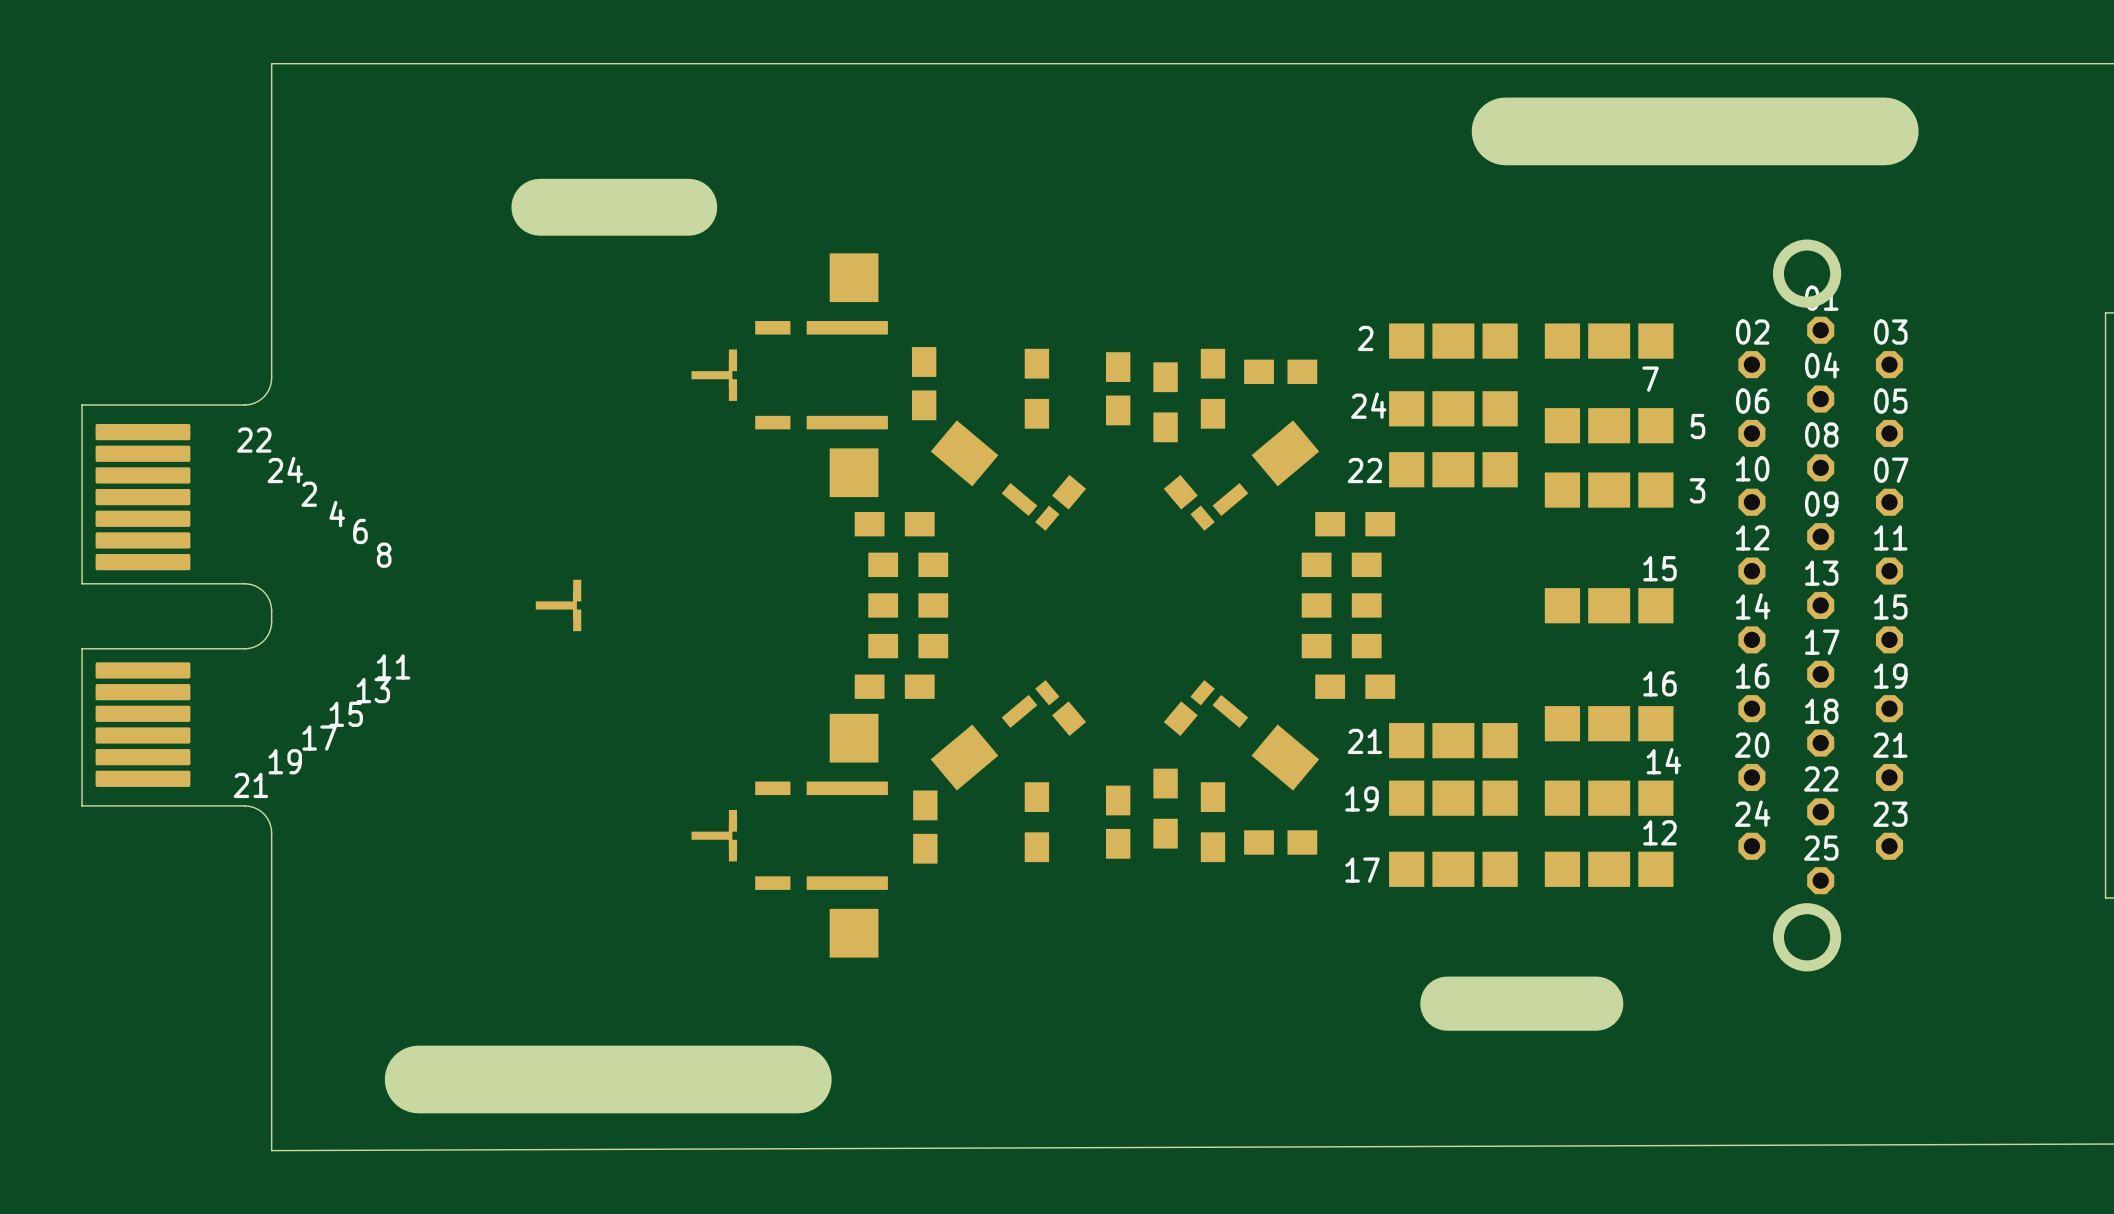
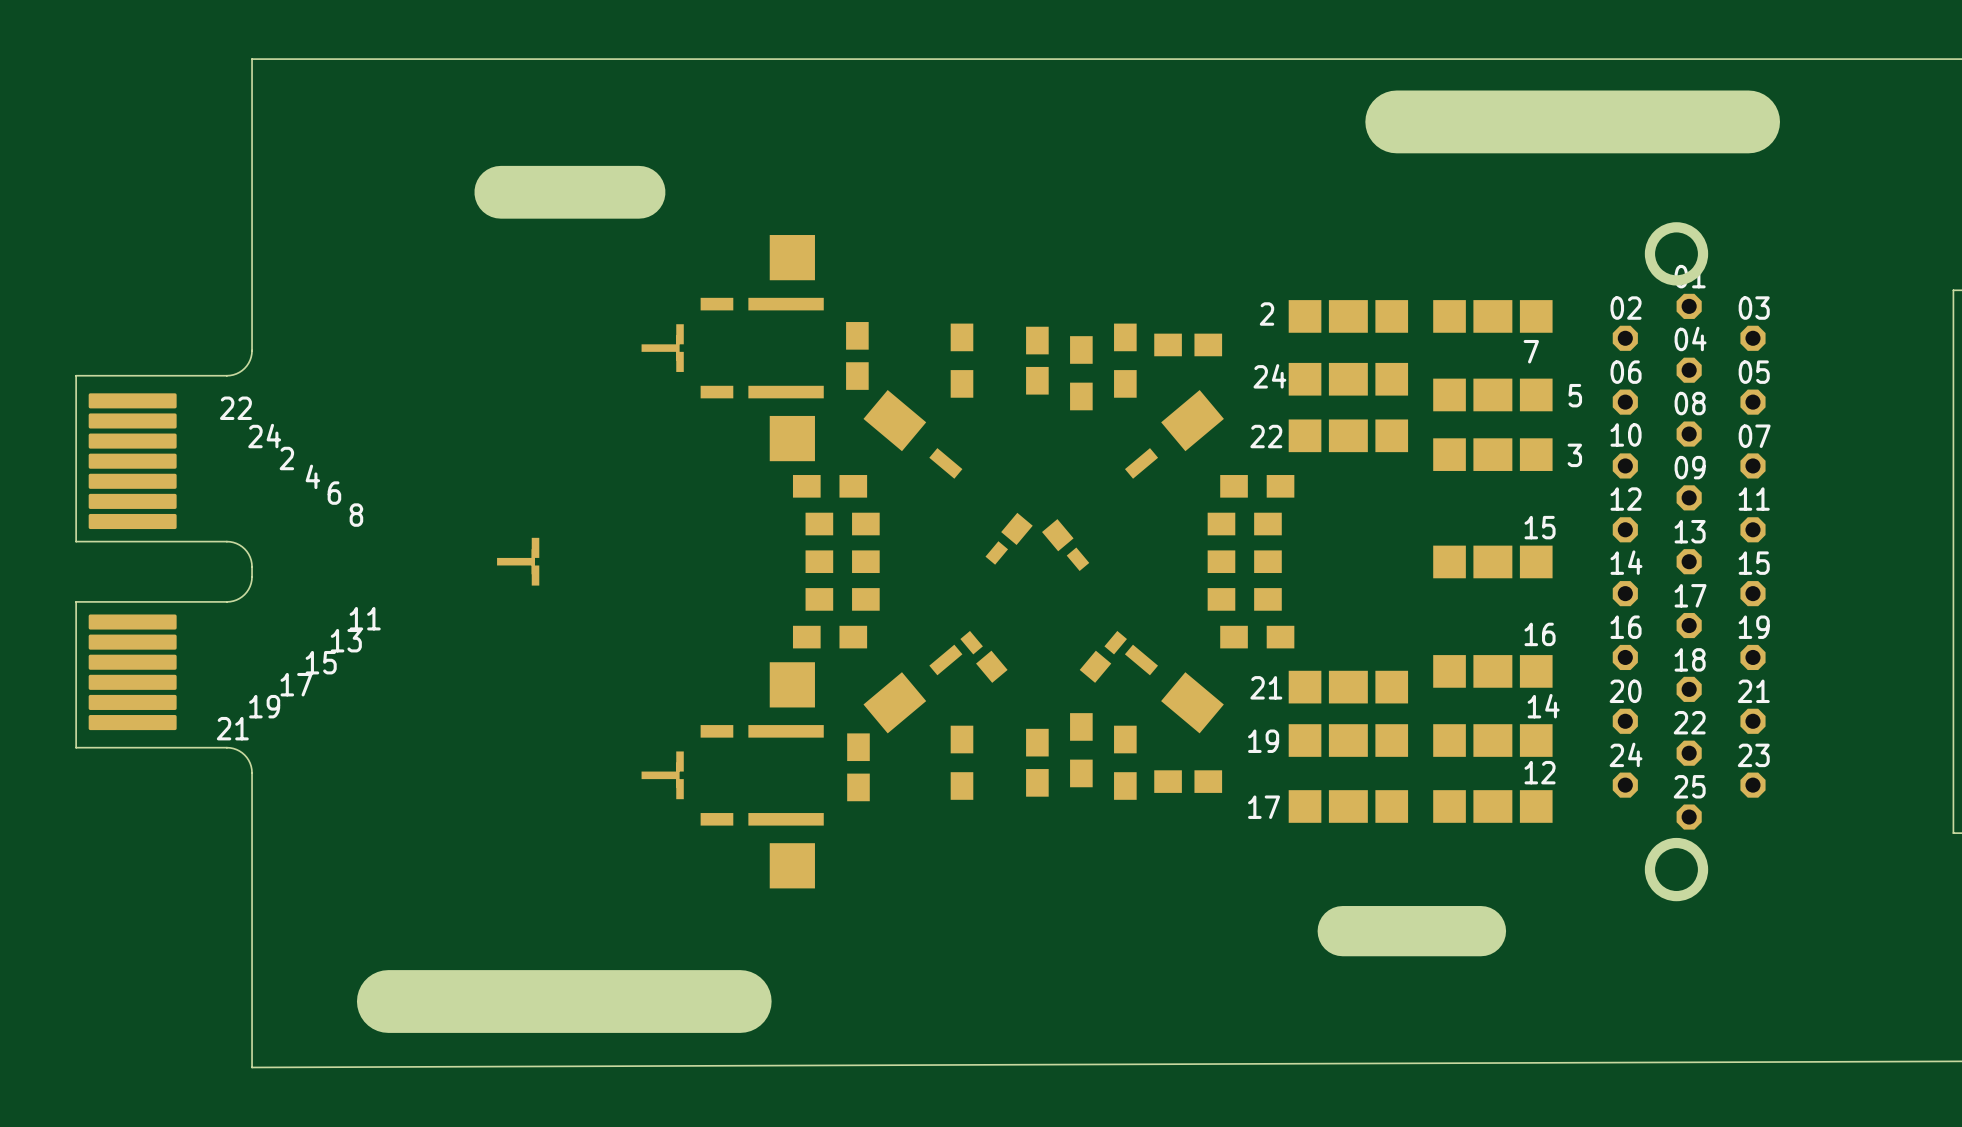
part position: (1060, 502) -> (1009, 538)
part position: (1189, 502) -> (1065, 545)

